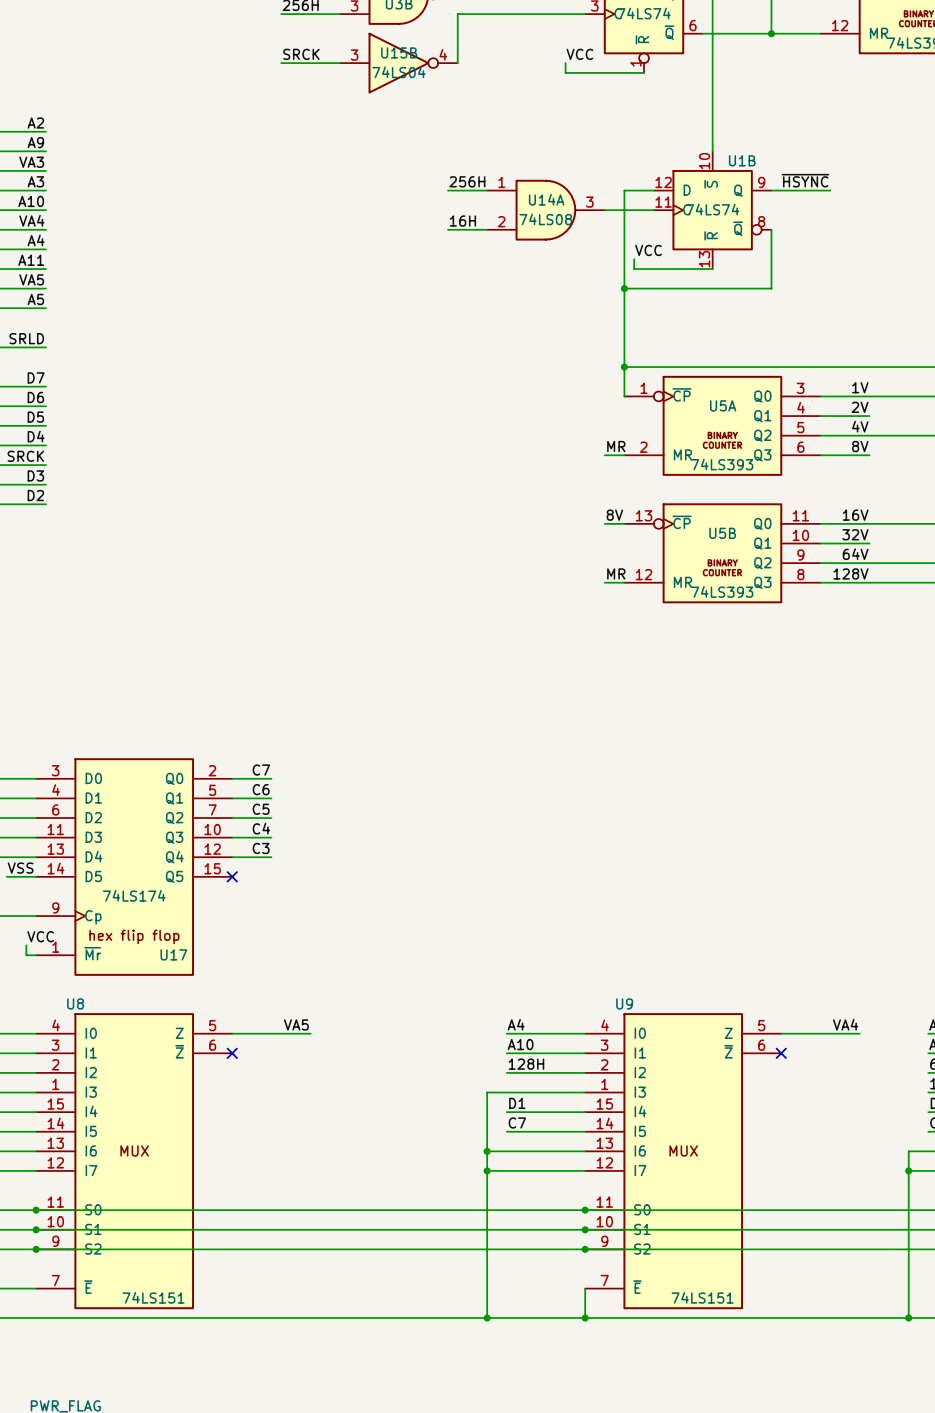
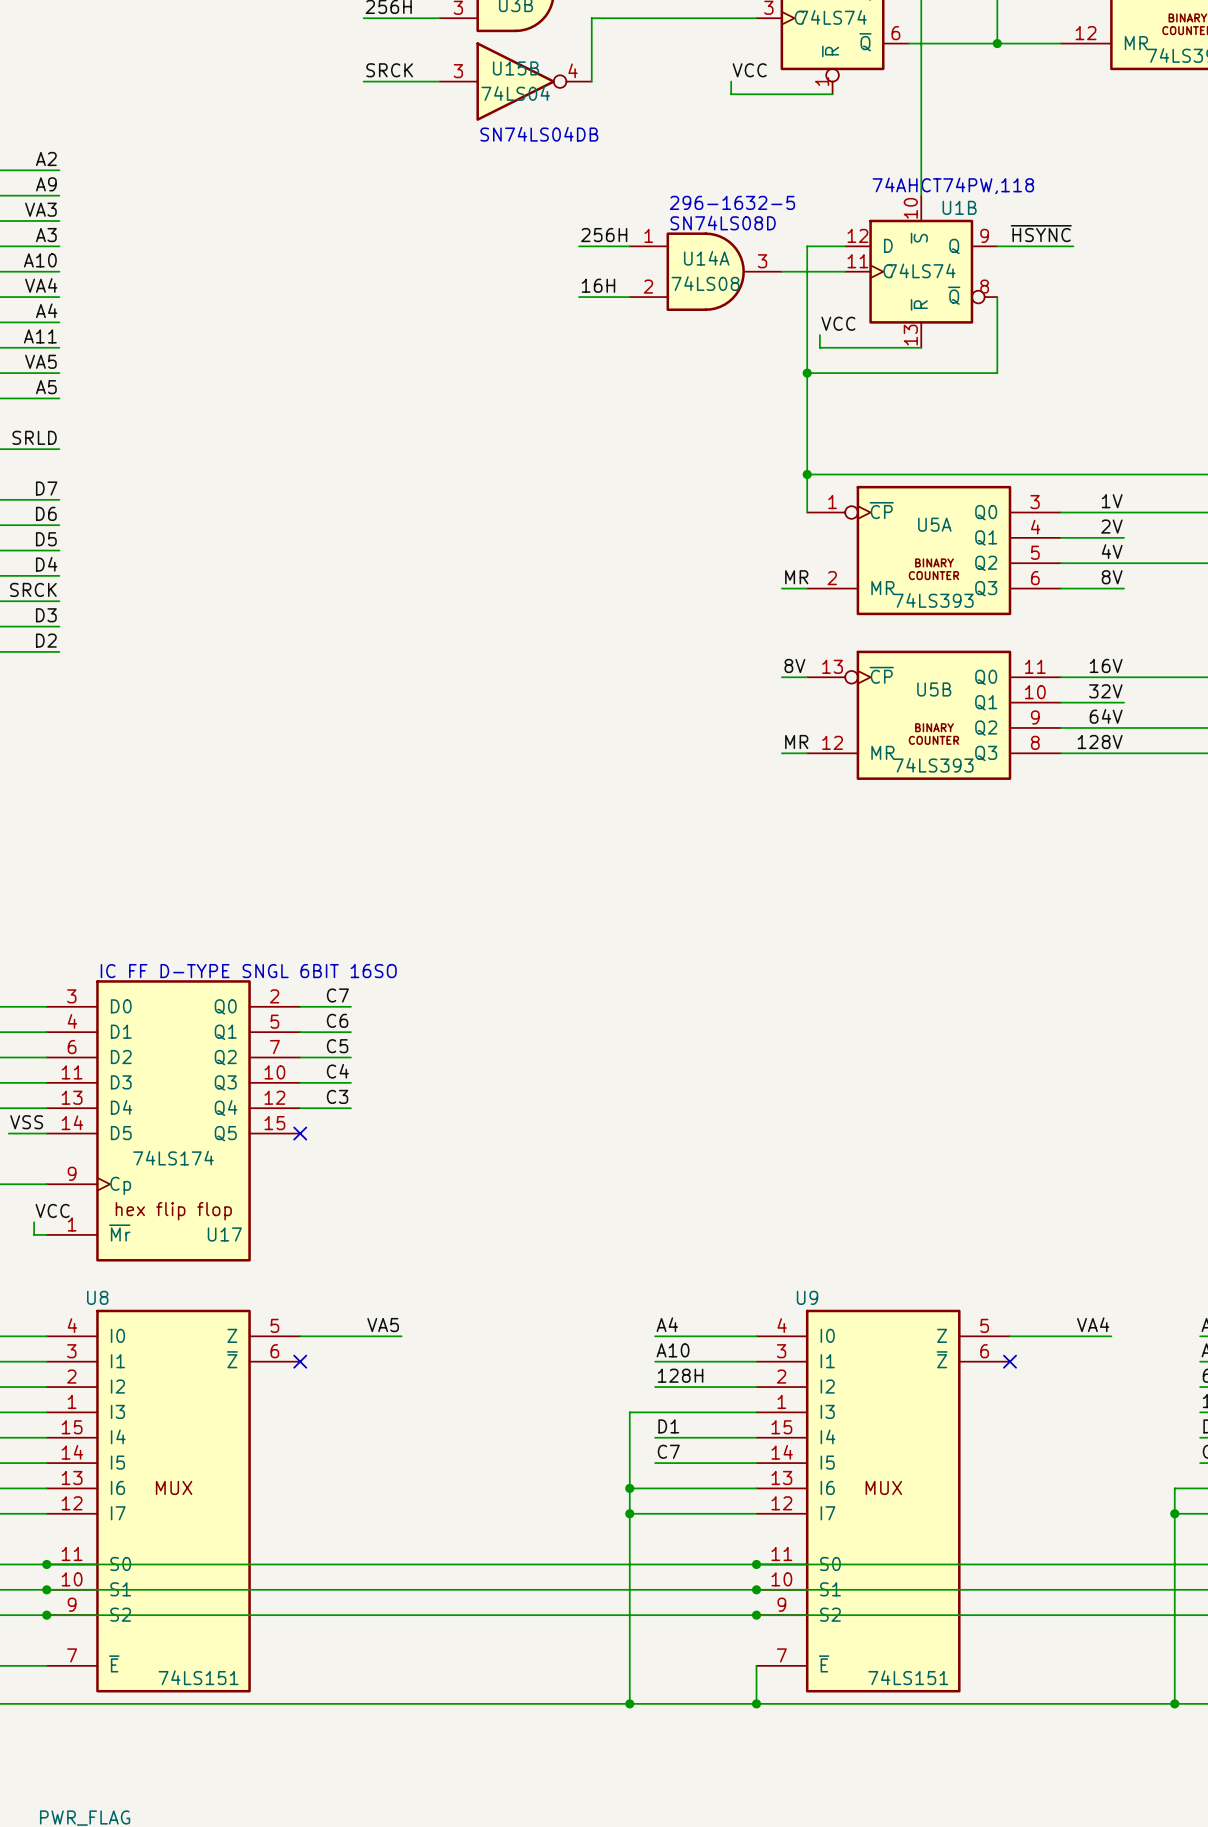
text: none -> SN74LS04DB (539, 134)
text: none -> 74AHCT74PW,118 (953, 185)
text: none -> 296-1632-5 (732, 202)
text: none -> SN74LS08D (723, 223)
text: none -> IC FF D-TYPE SNGL 6BIT 16SO (248, 971)

